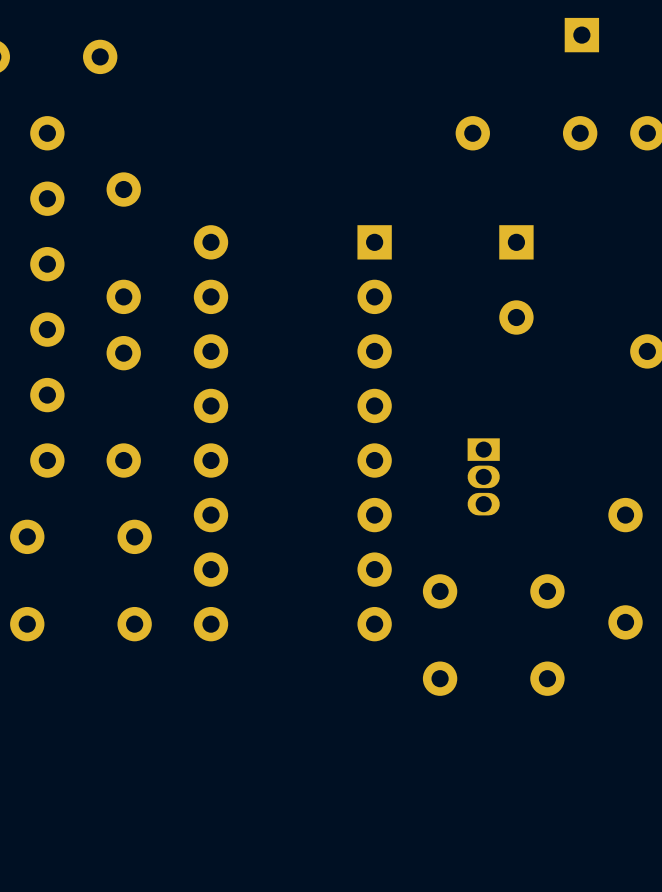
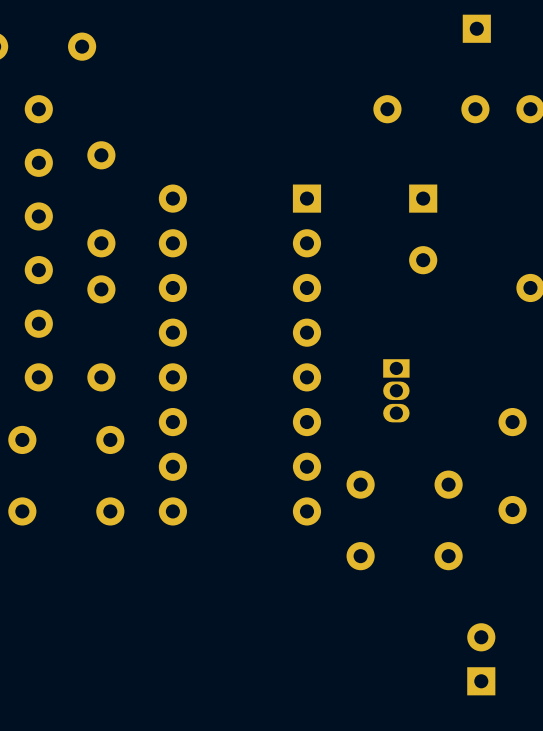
part: none -> (481, 659)

